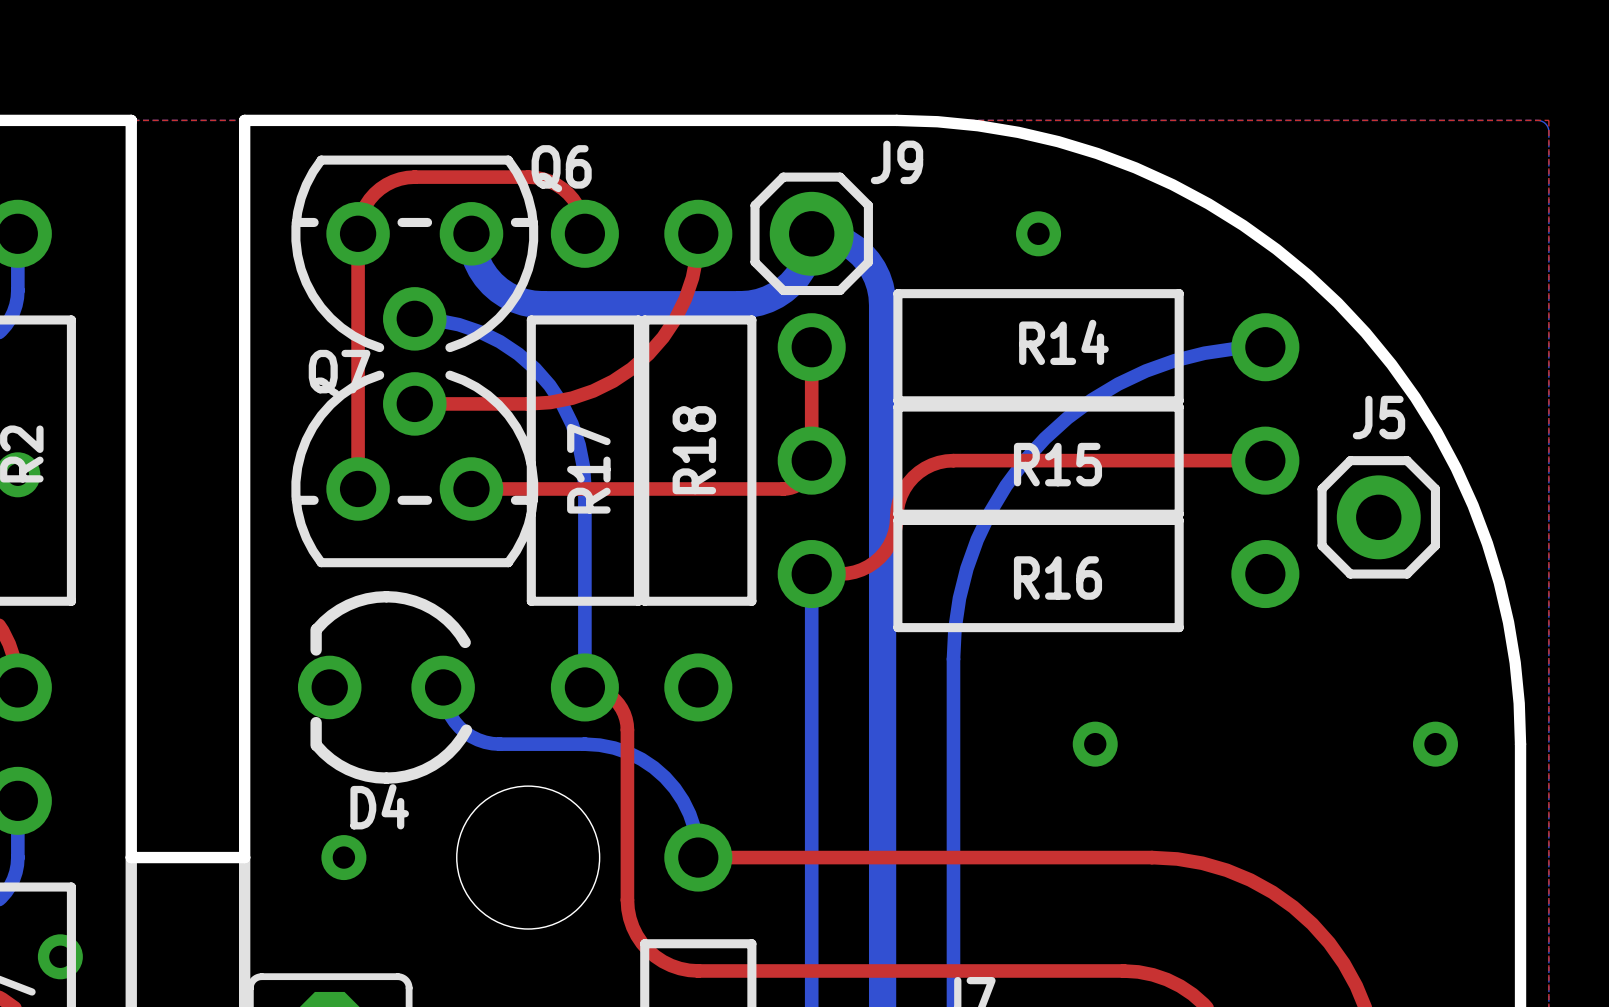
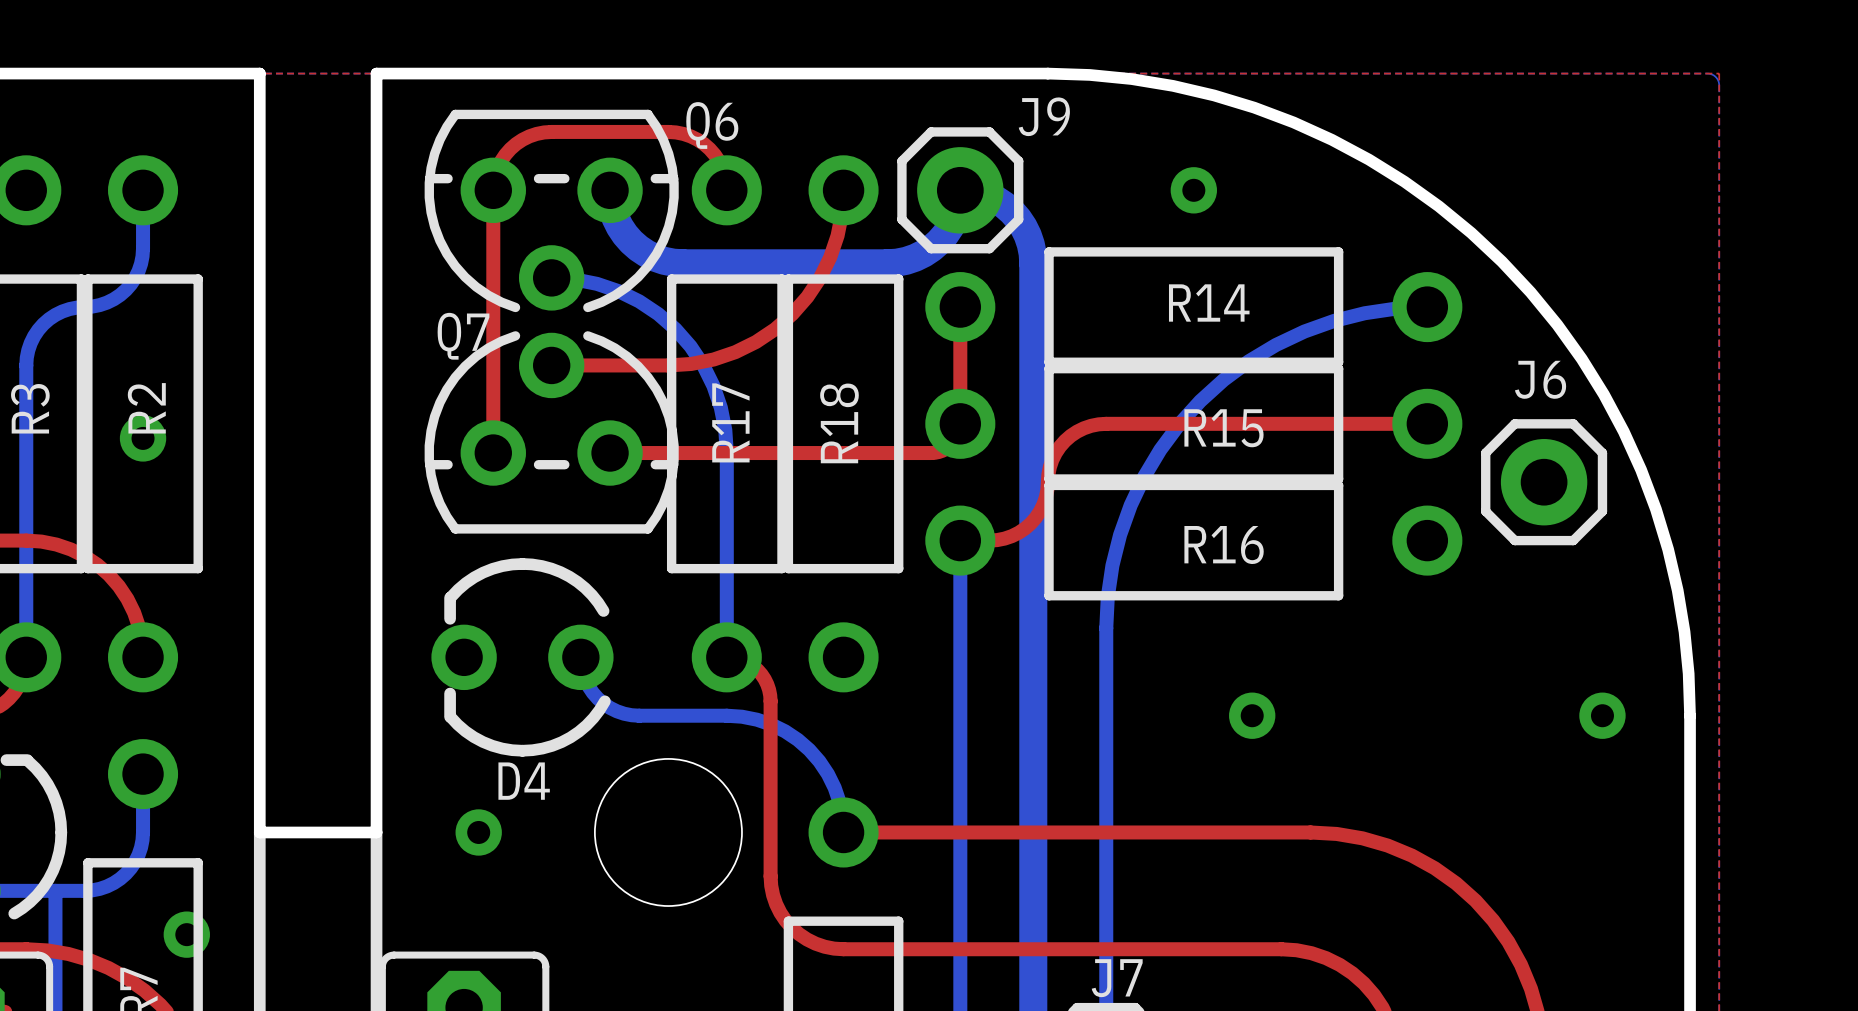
J5 name: J5 (1379, 417) -> J6 (1540, 379)

